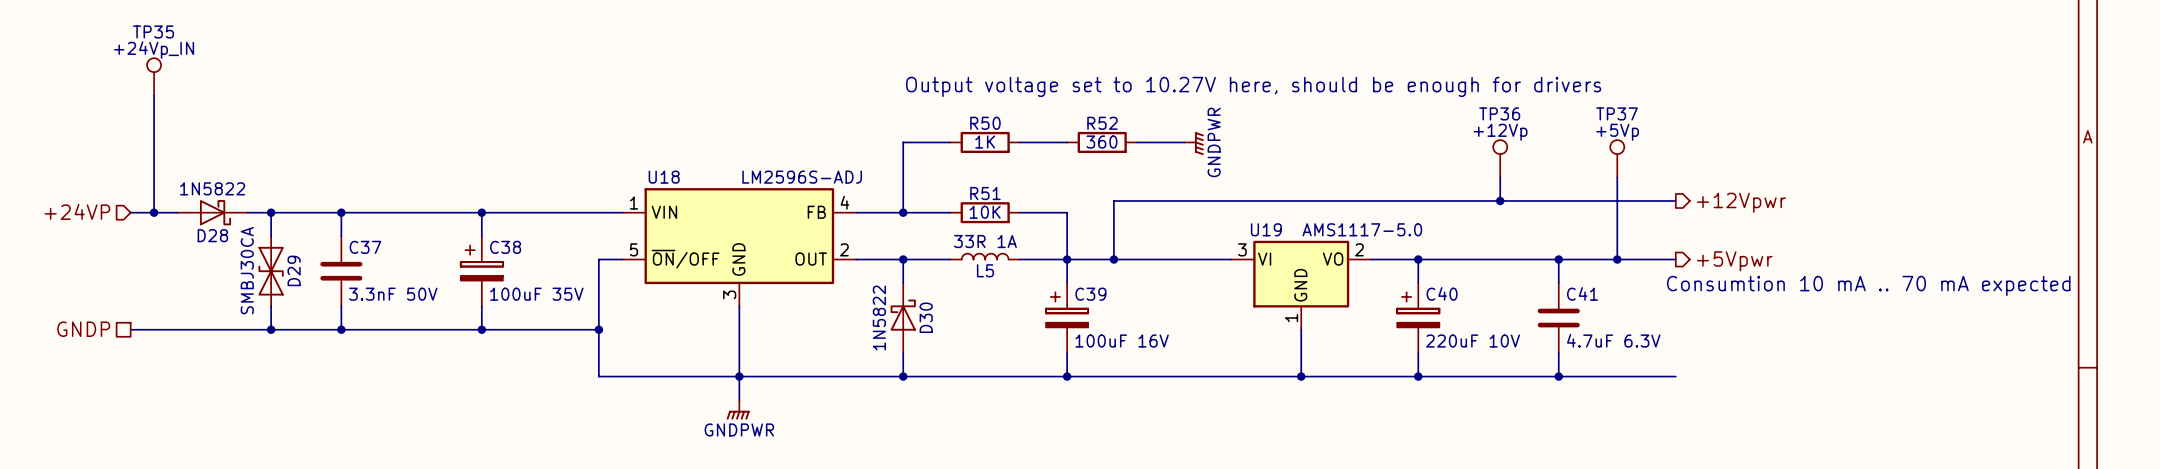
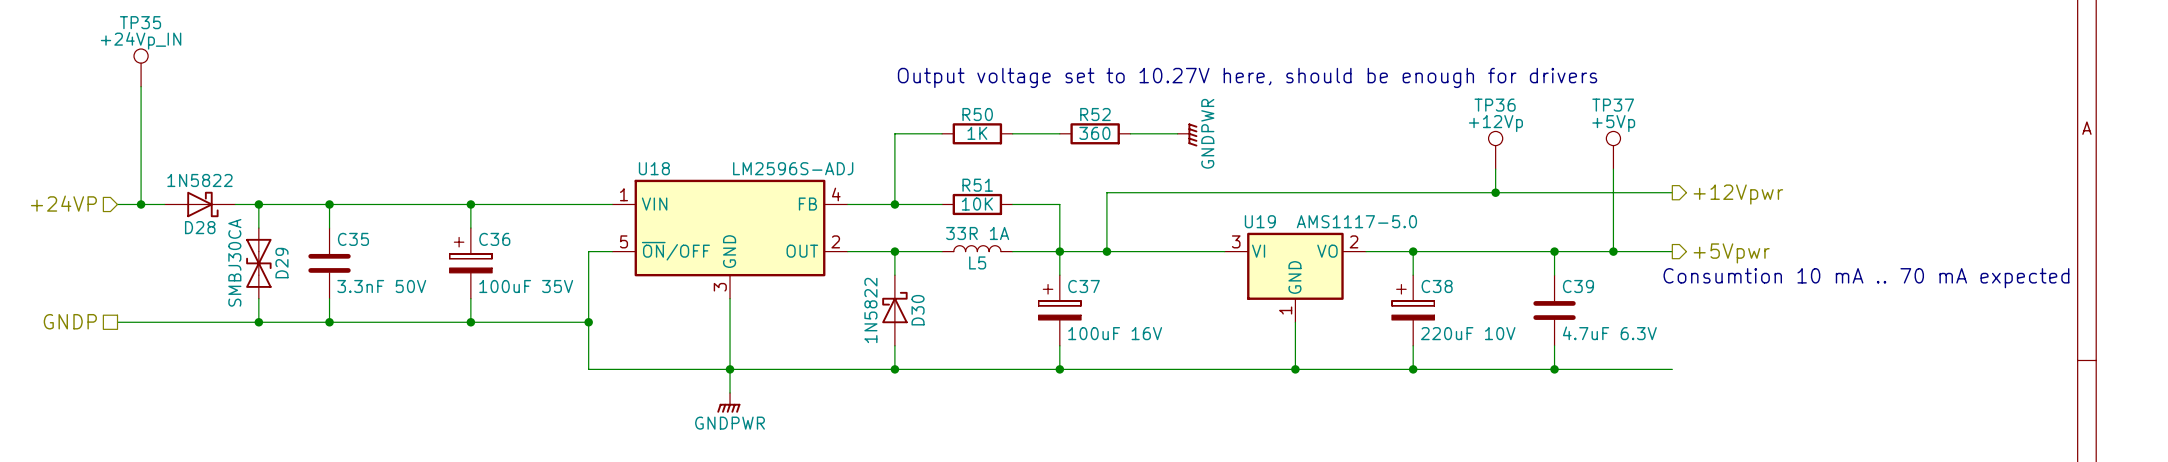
C37 name: C37 (365, 247) -> C35 (353, 239)
C38 name: C38 (505, 247) -> C36 (494, 239)
C40 name: C40 (1442, 293) -> C38 (1437, 286)
C41 name: C41 (1582, 293) -> C39 (1578, 286)
C39 name: C39 (1090, 294) -> C37 (1084, 286)

